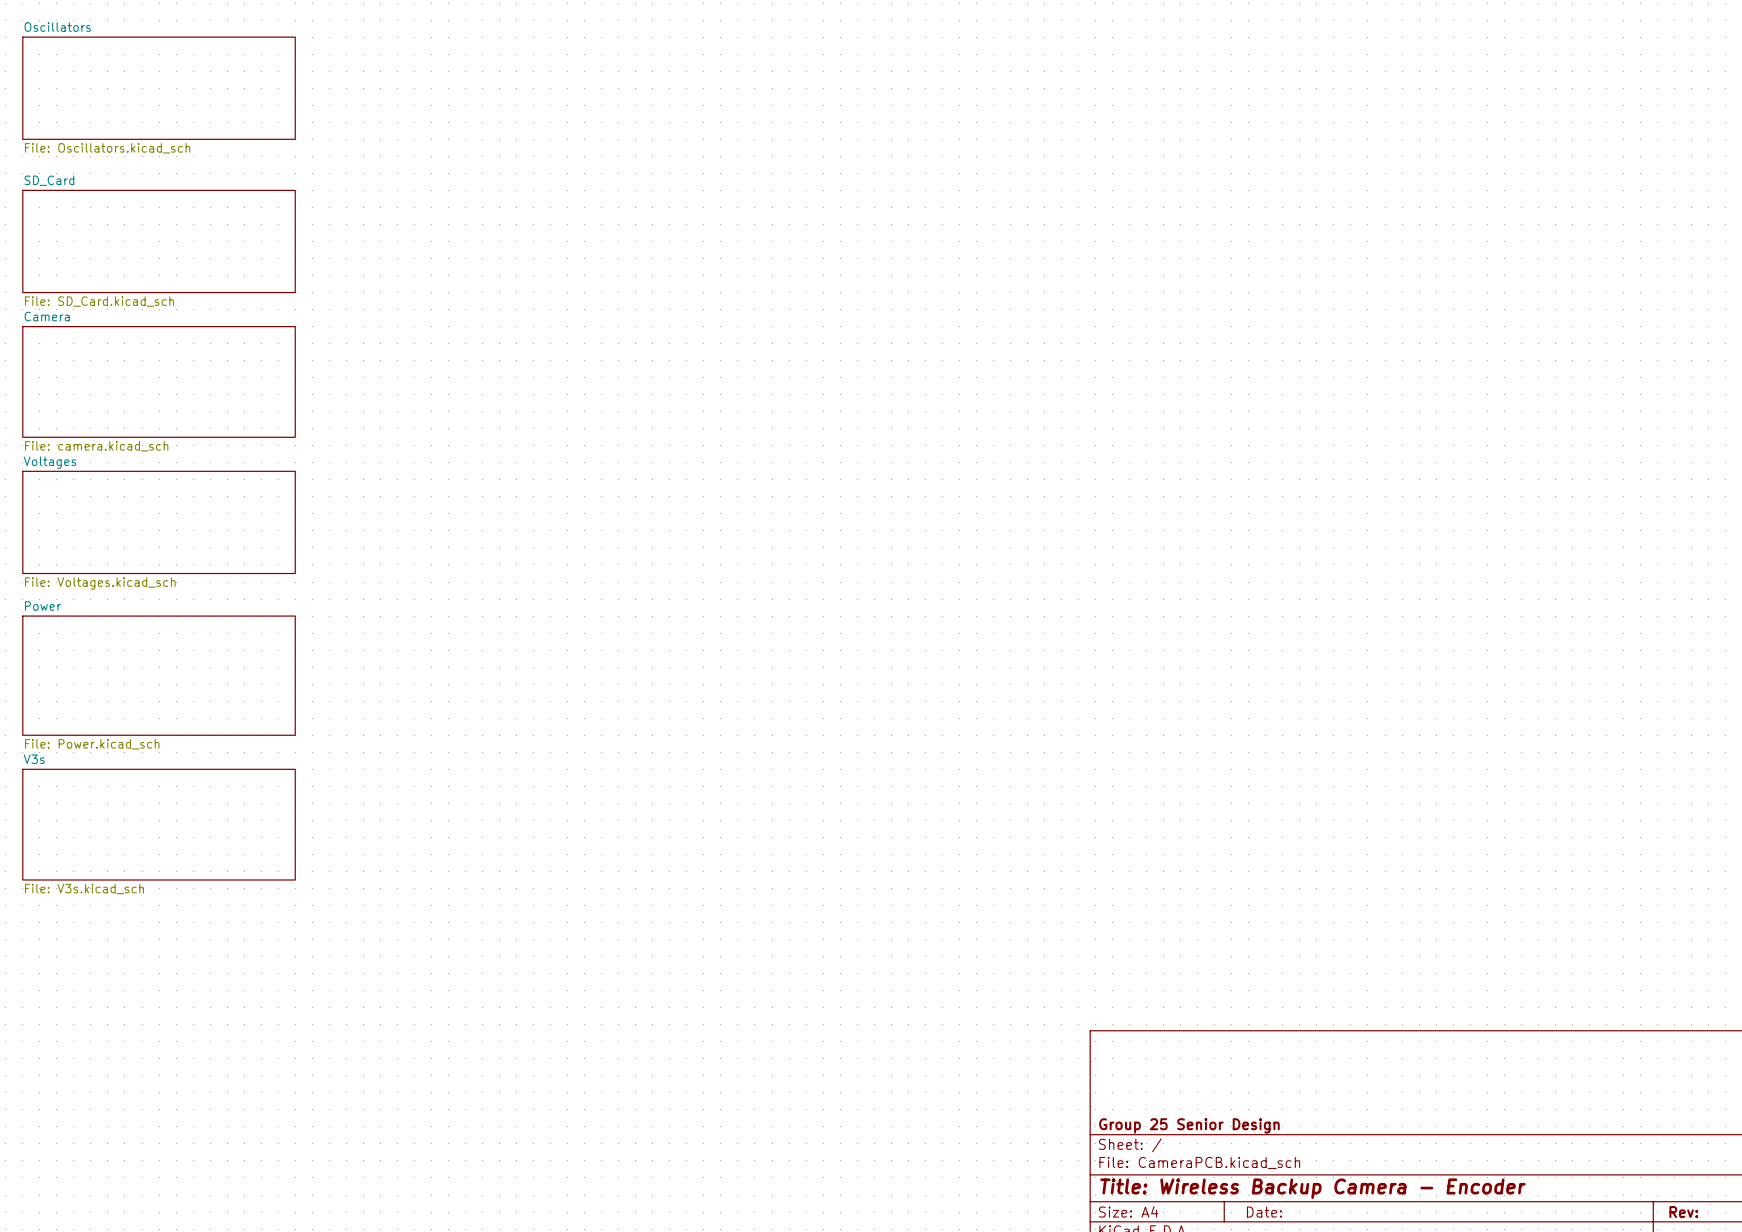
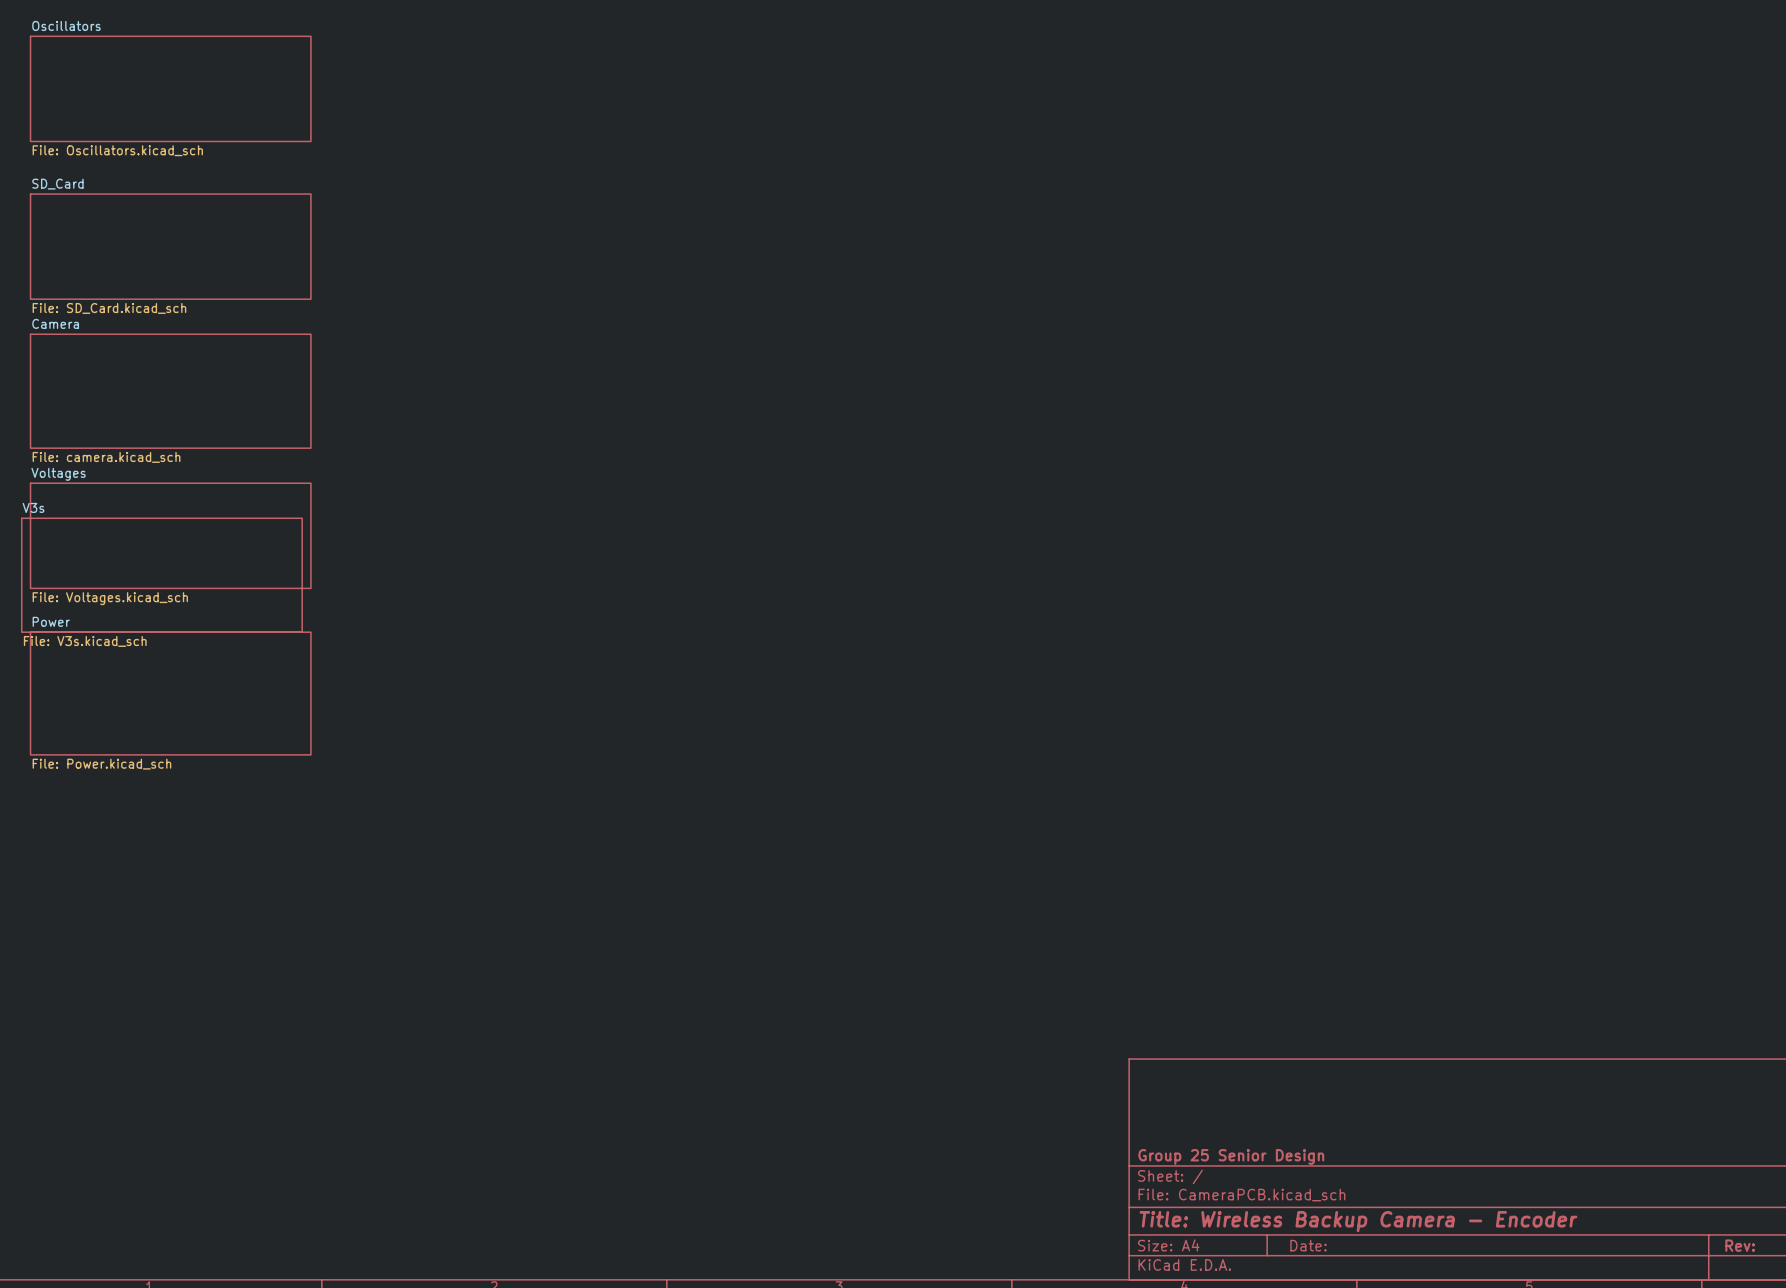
sheet V3s position: (159, 824) -> (161, 575)

